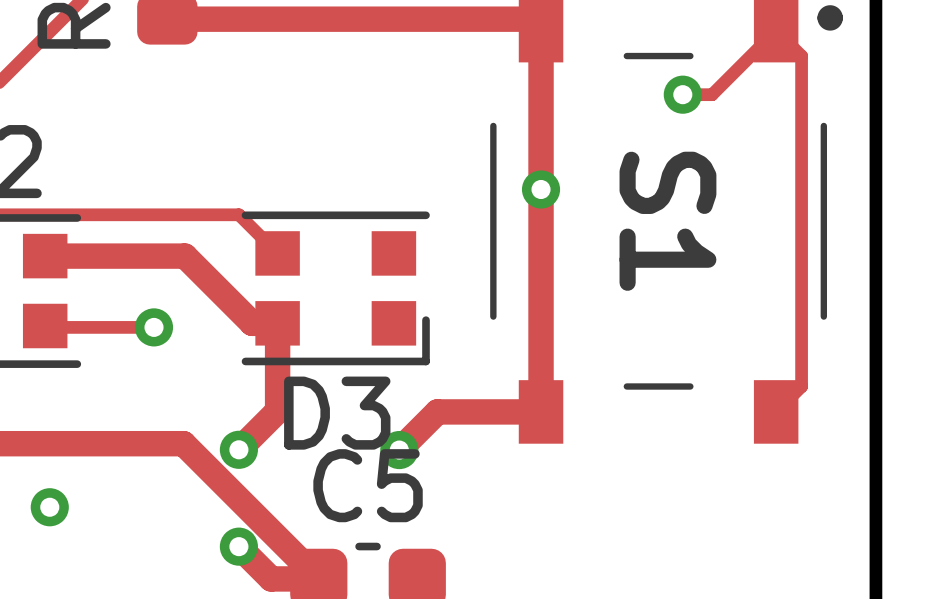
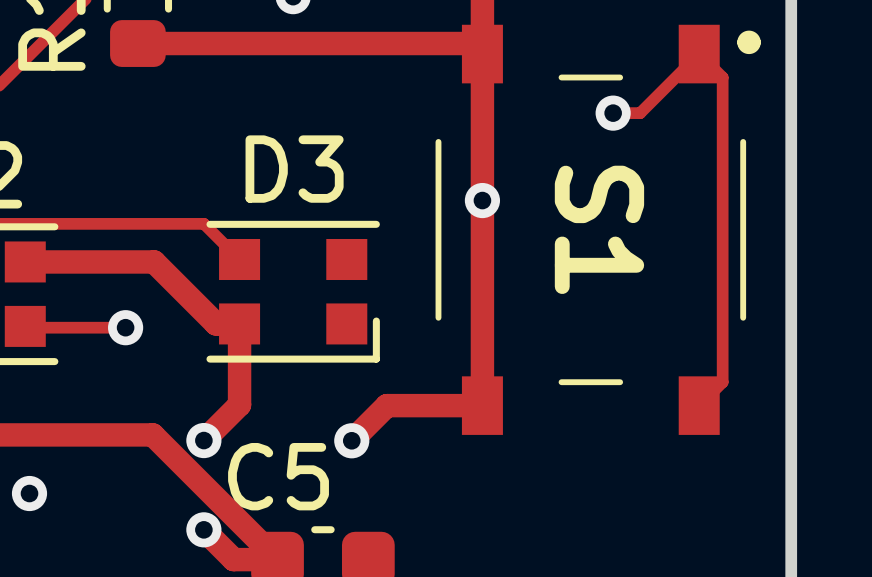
D3 name position: D3 (337, 413) -> D3 (294, 169)
C5 name position: C5 (368, 485) -> C5 (278, 476)

